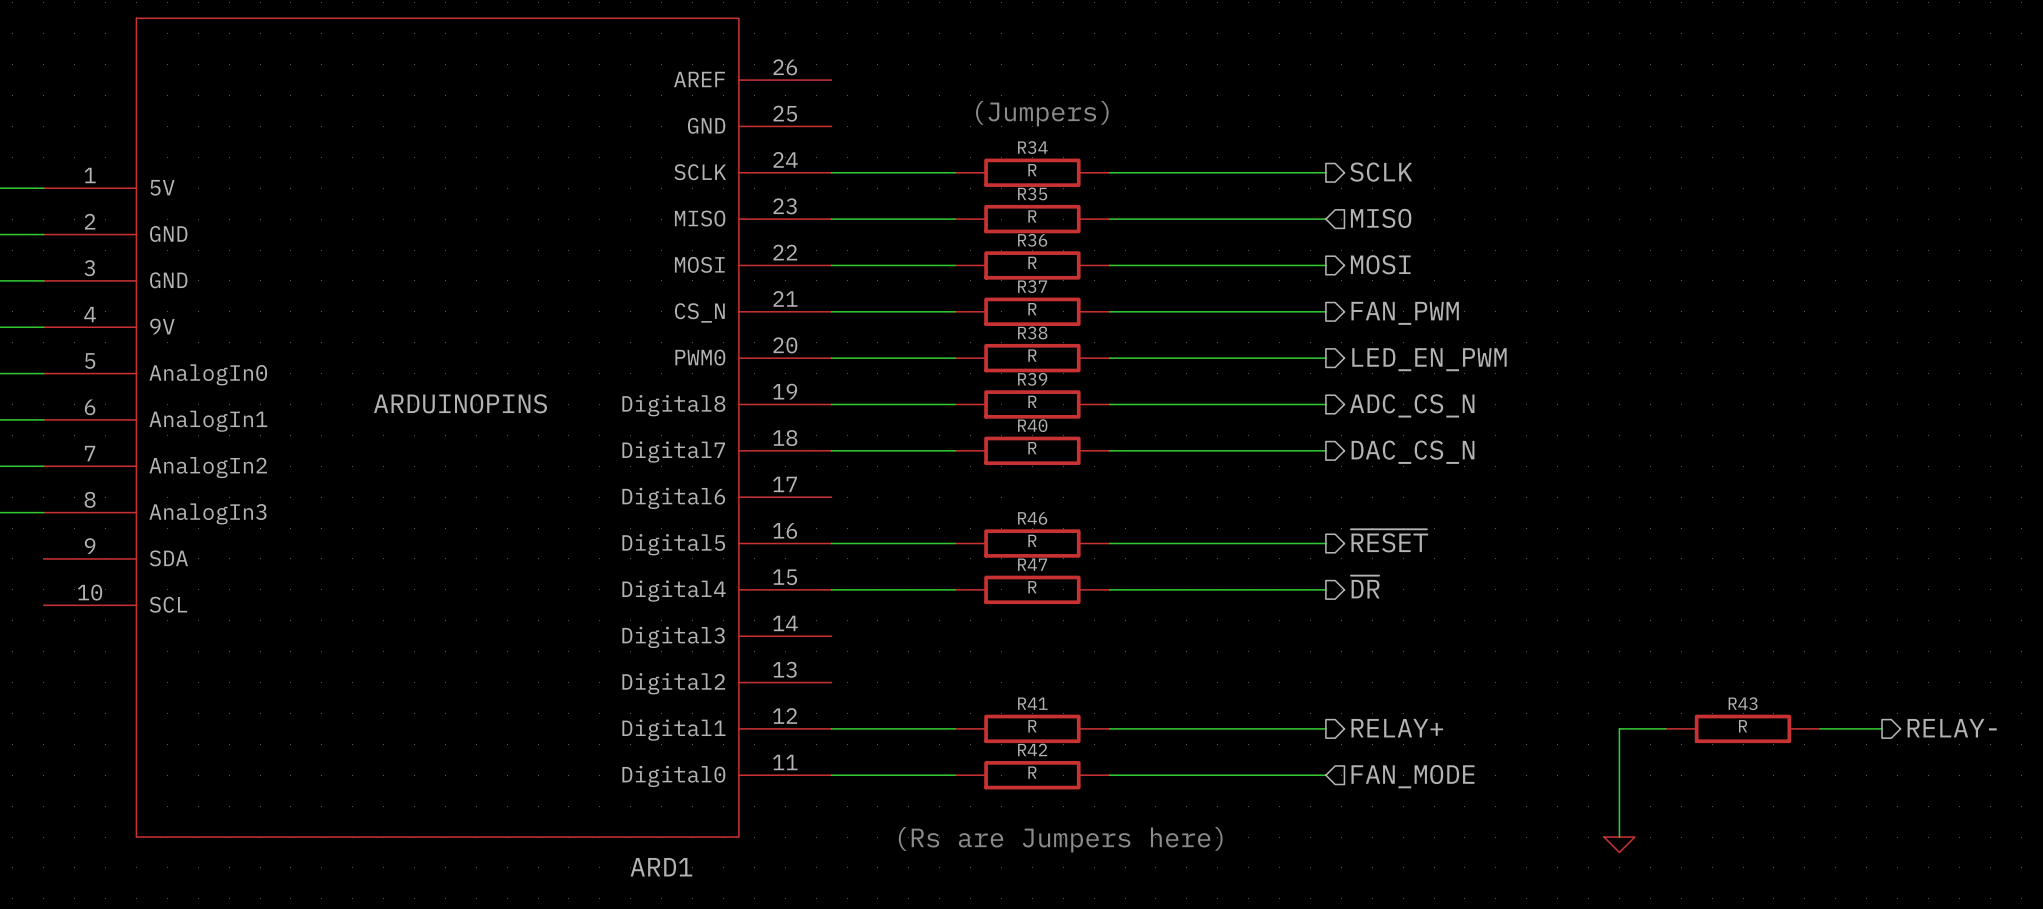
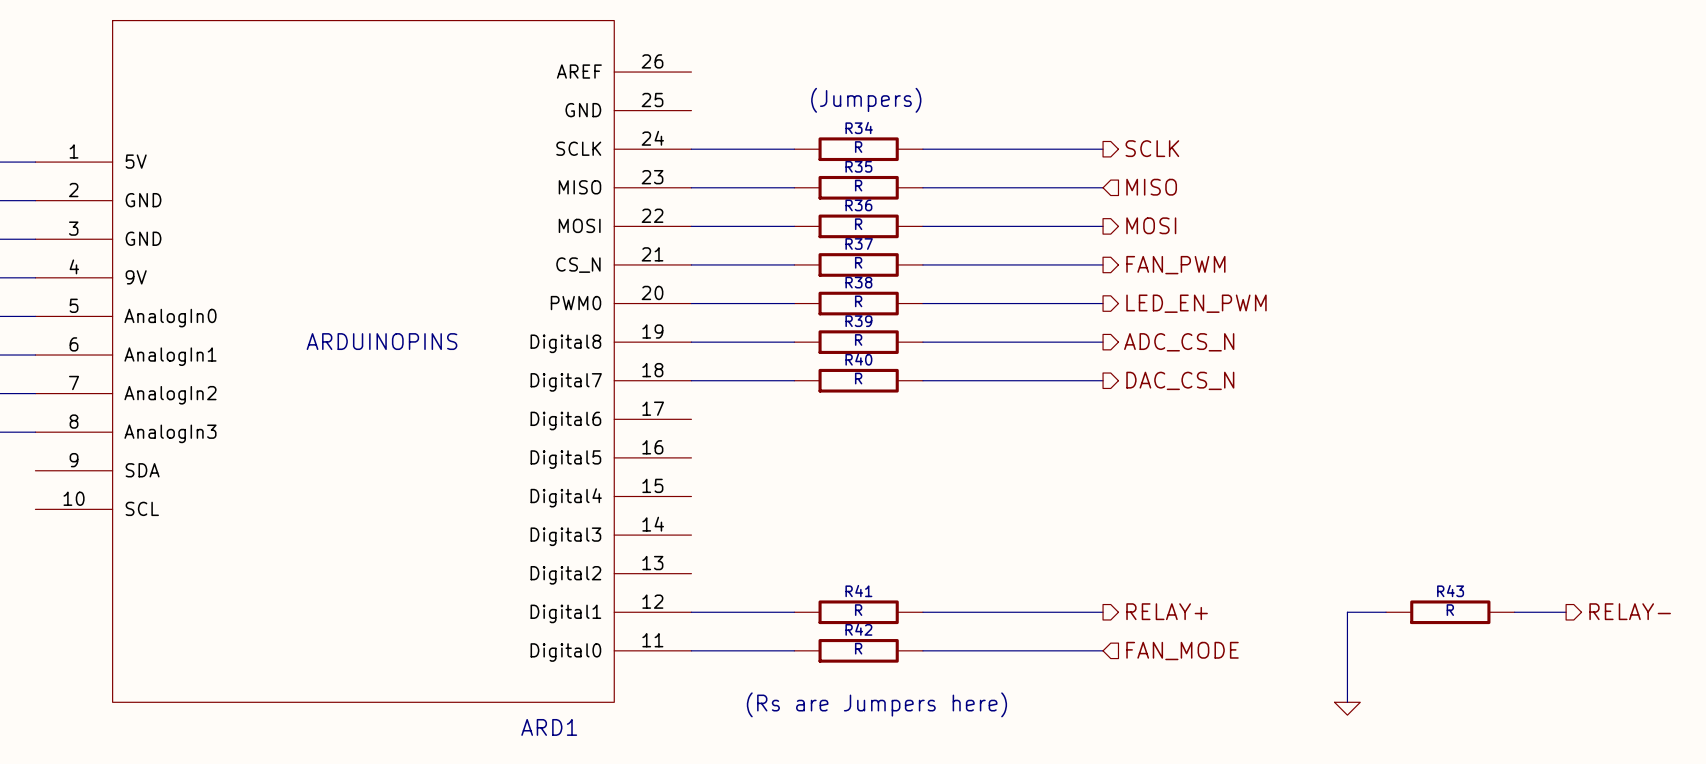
hierarchical label: ~{RESET} (1389, 540) -> none
wire: (831, 543) (955, 543) -> none
R46: R (1032, 543) -> none
wire: (1109, 543) (1325, 543) -> none
hierarchical label: ~{DR} (1365, 587) -> none
wire: (831, 589) (955, 589) -> none
R47: R (1032, 589) -> none
wire: (1109, 589) (1325, 589) -> none

